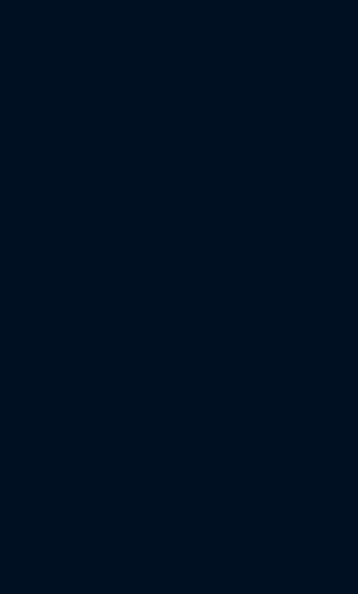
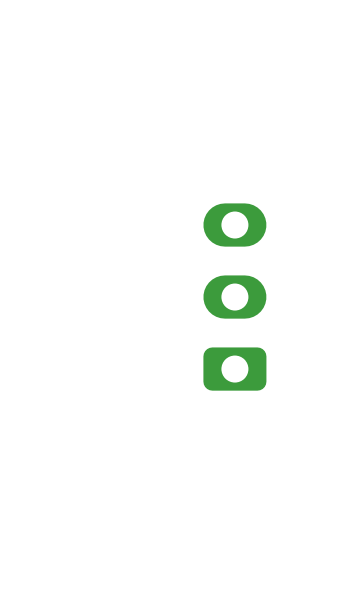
part: none -> (234, 297)

